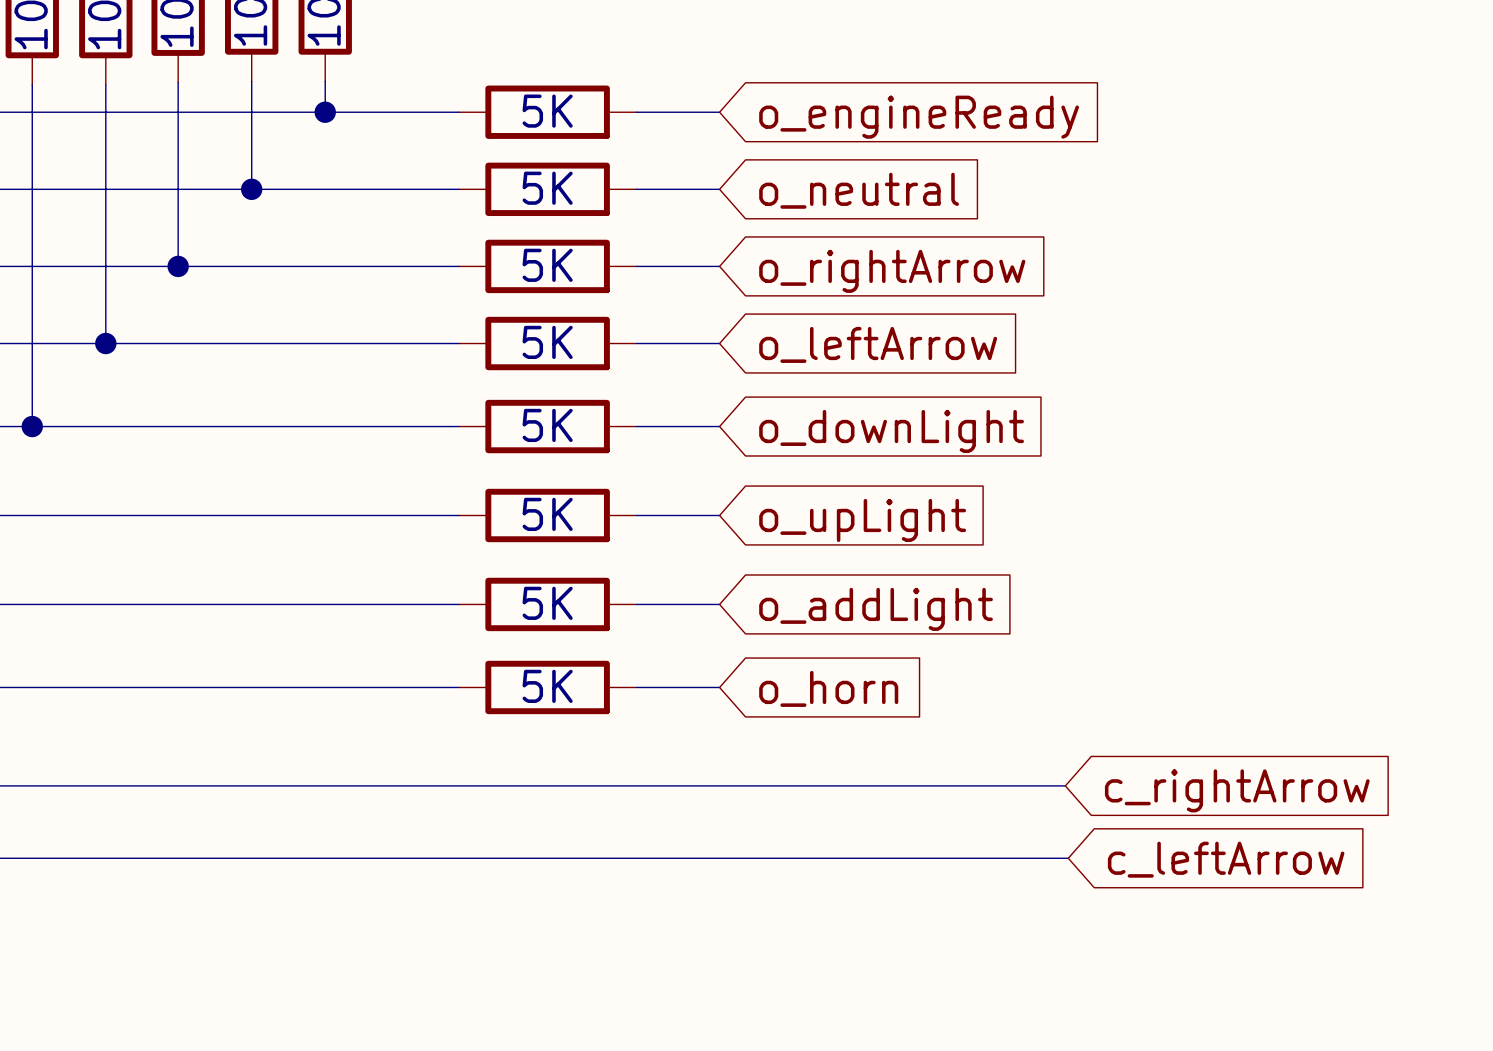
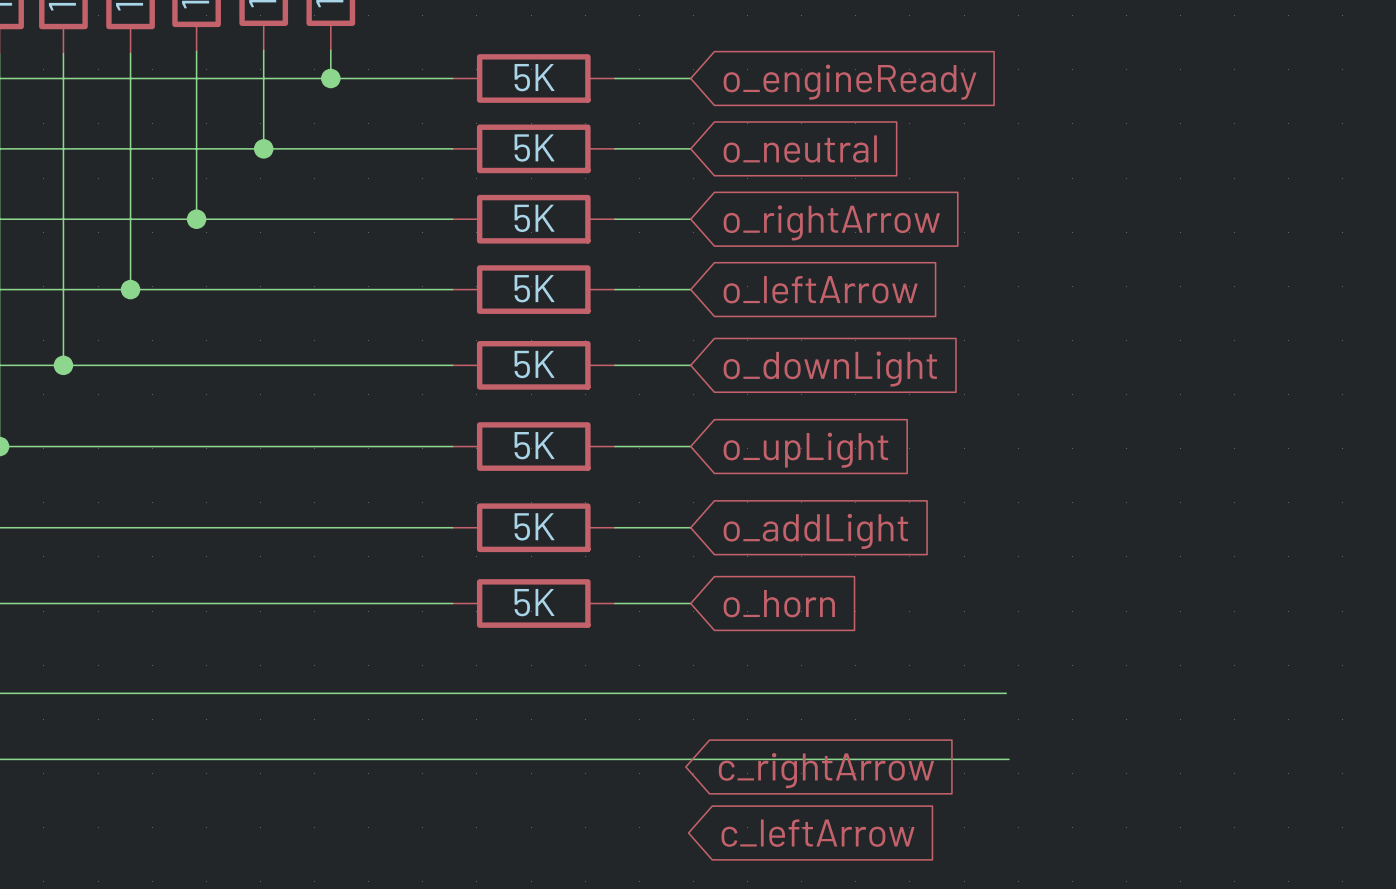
global label position: c_rightArrow (1237, 790) -> c_rightArrow (826, 770)
global label position: c_leftArrow (1226, 859) -> c_leftArrow (818, 833)

